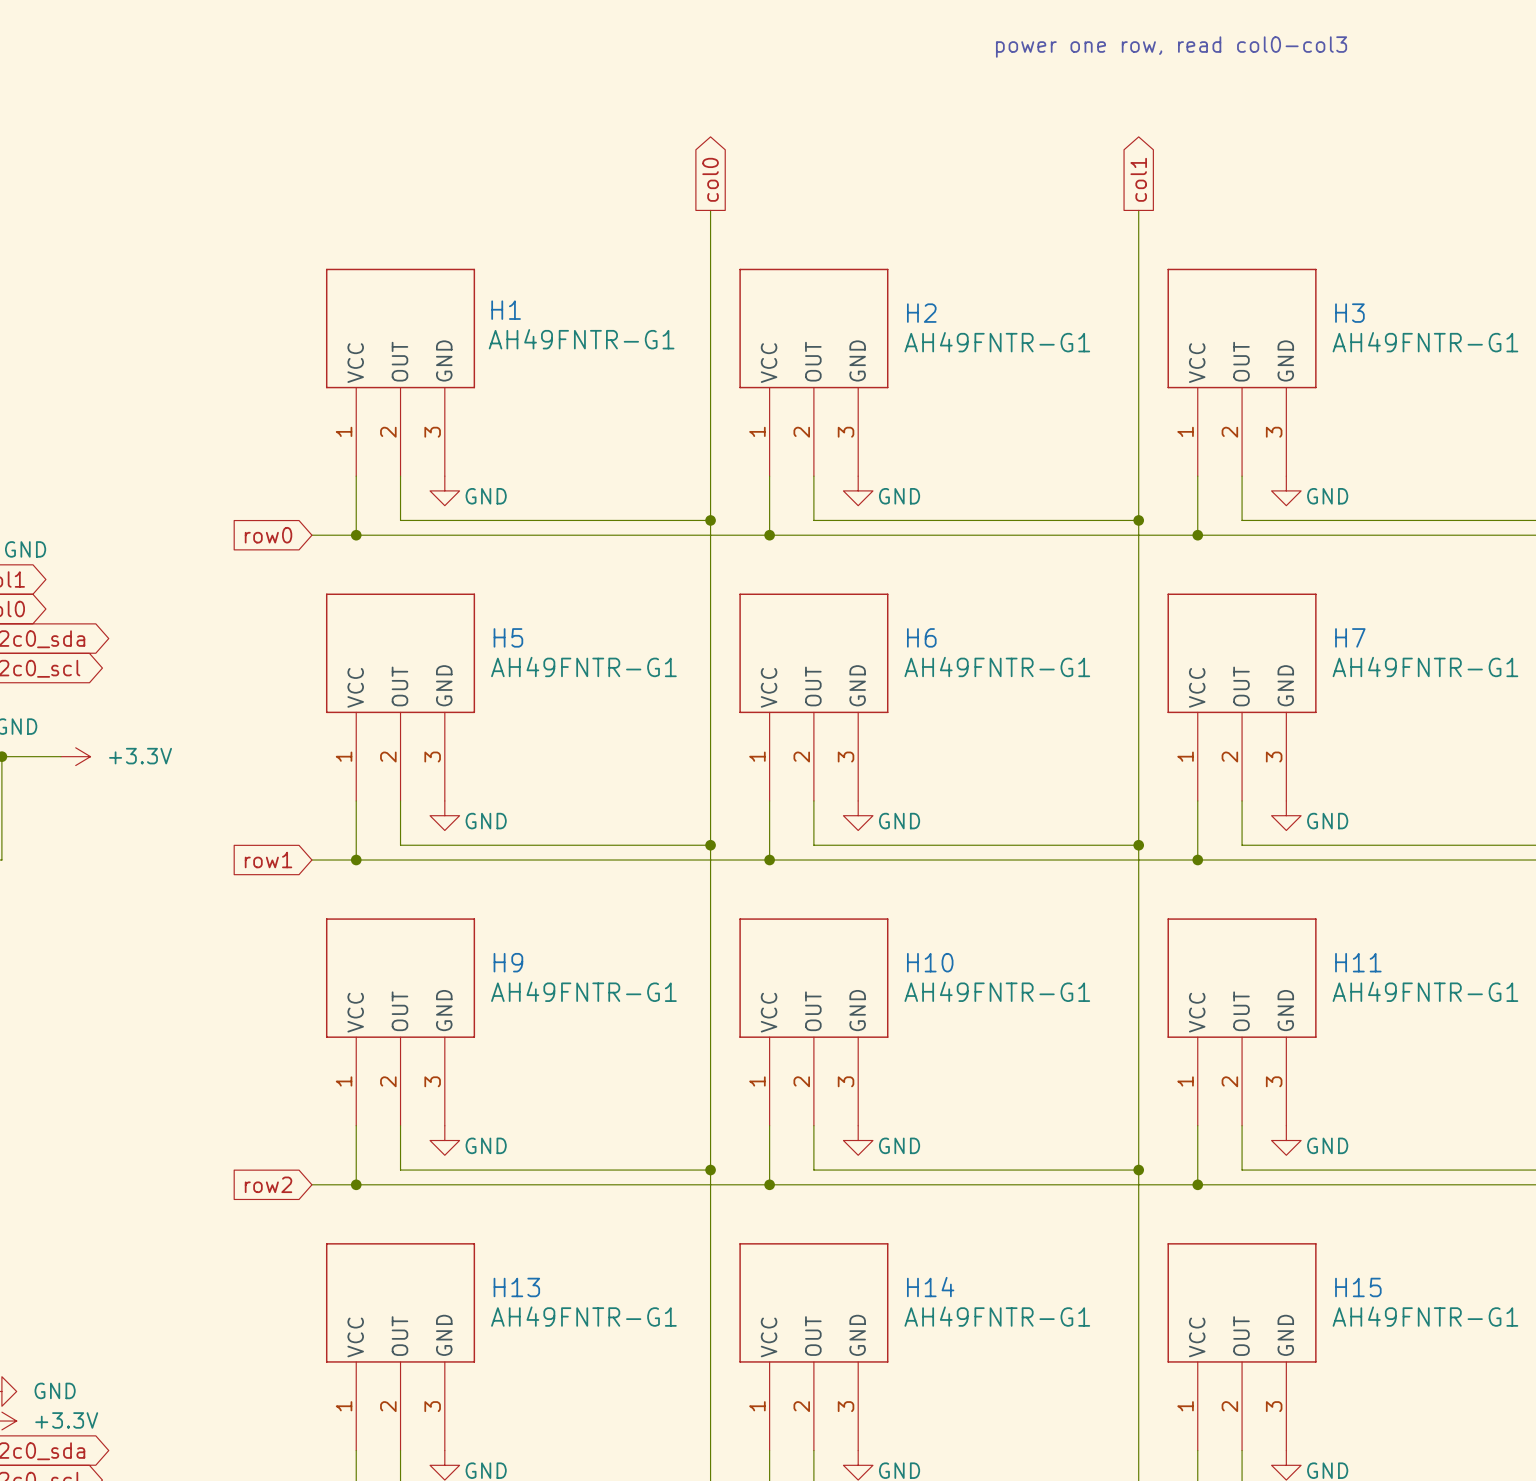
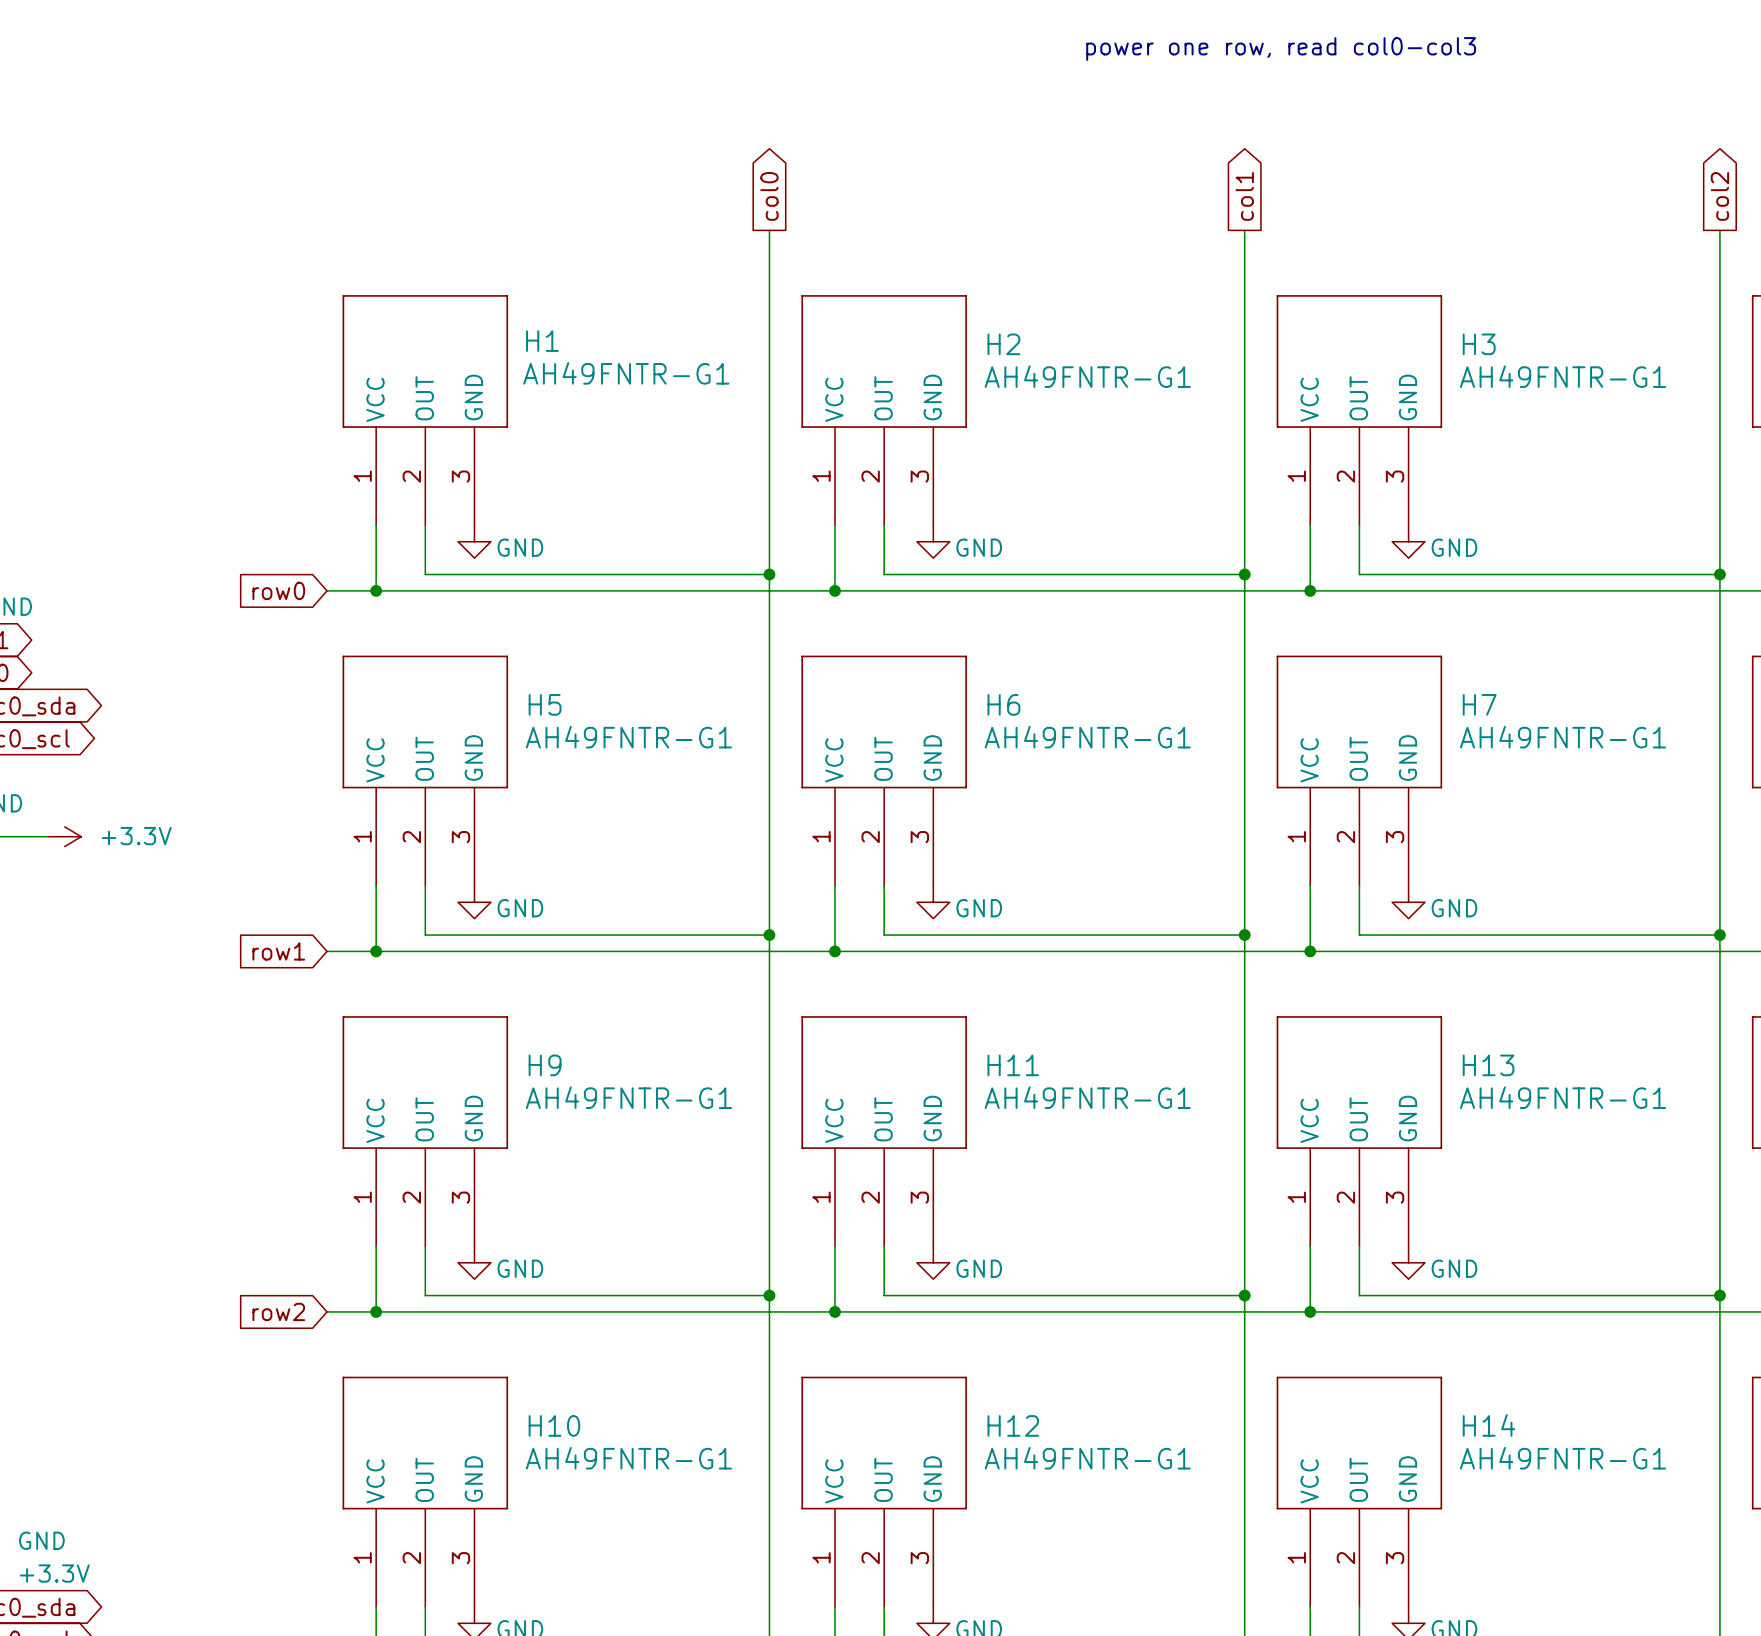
H10 name: H10 (930, 962) -> H11 (1013, 1065)
H11 name: H11 (1358, 962) -> H13 (1488, 1065)
H13 name: H13 (516, 1287) -> H10 (554, 1425)
H14 name: H14 (930, 1287) -> H12 (1013, 1425)
H15 name: H15 (1358, 1287) -> H14 (1488, 1425)

